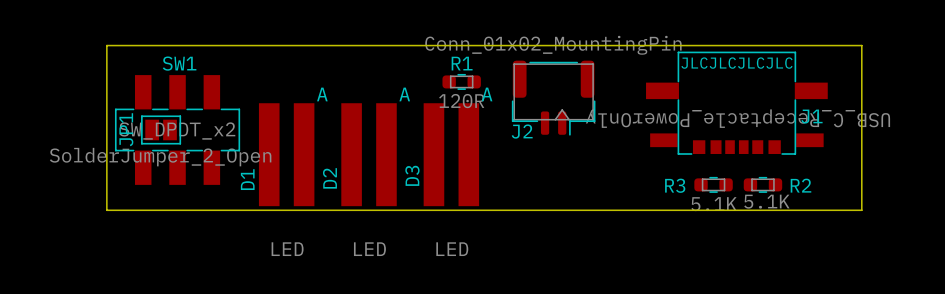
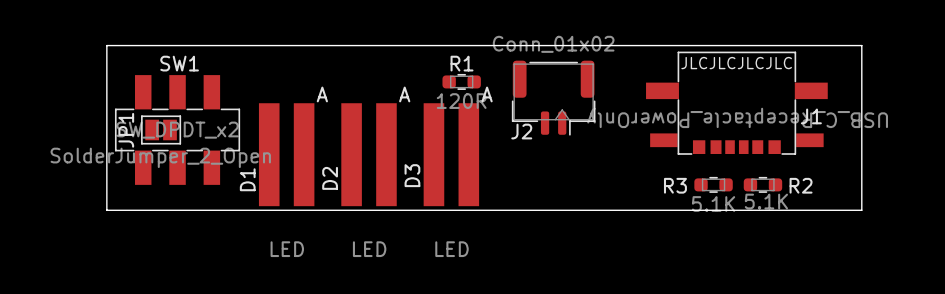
J2 value: Conn_01x02_MountingPin (553, 45) -> Conn_01x02 (553, 44)

